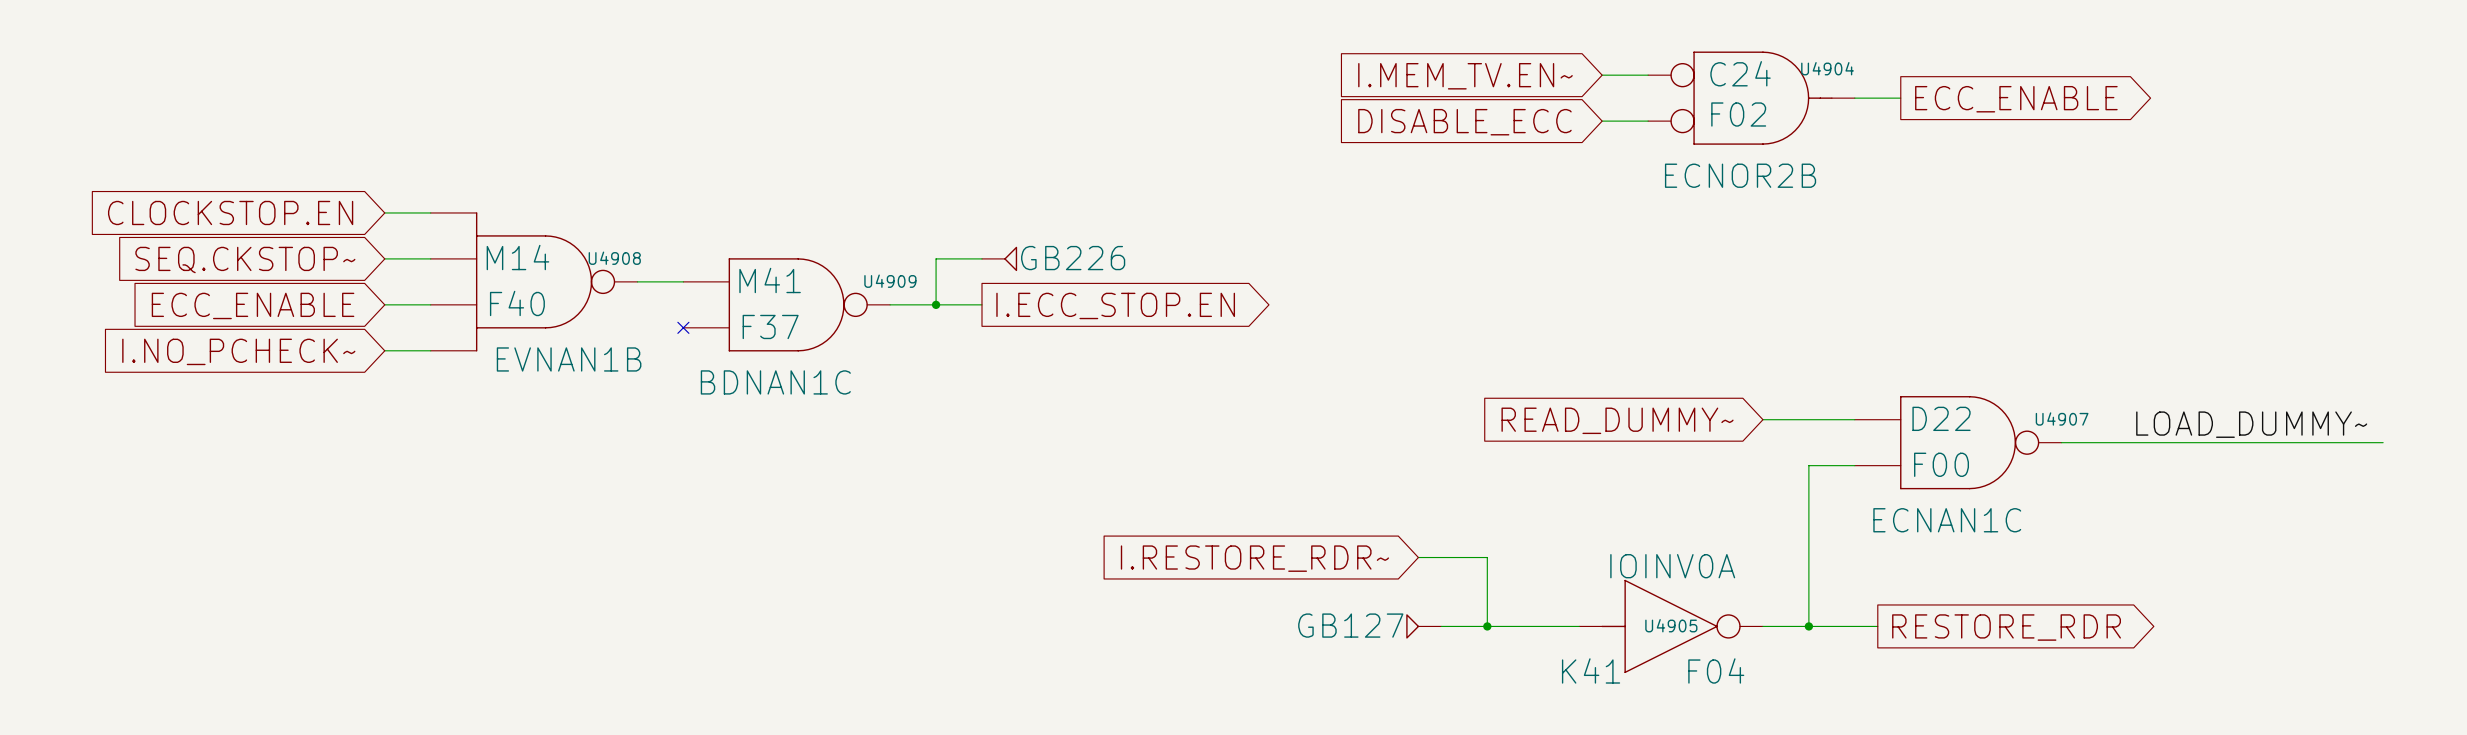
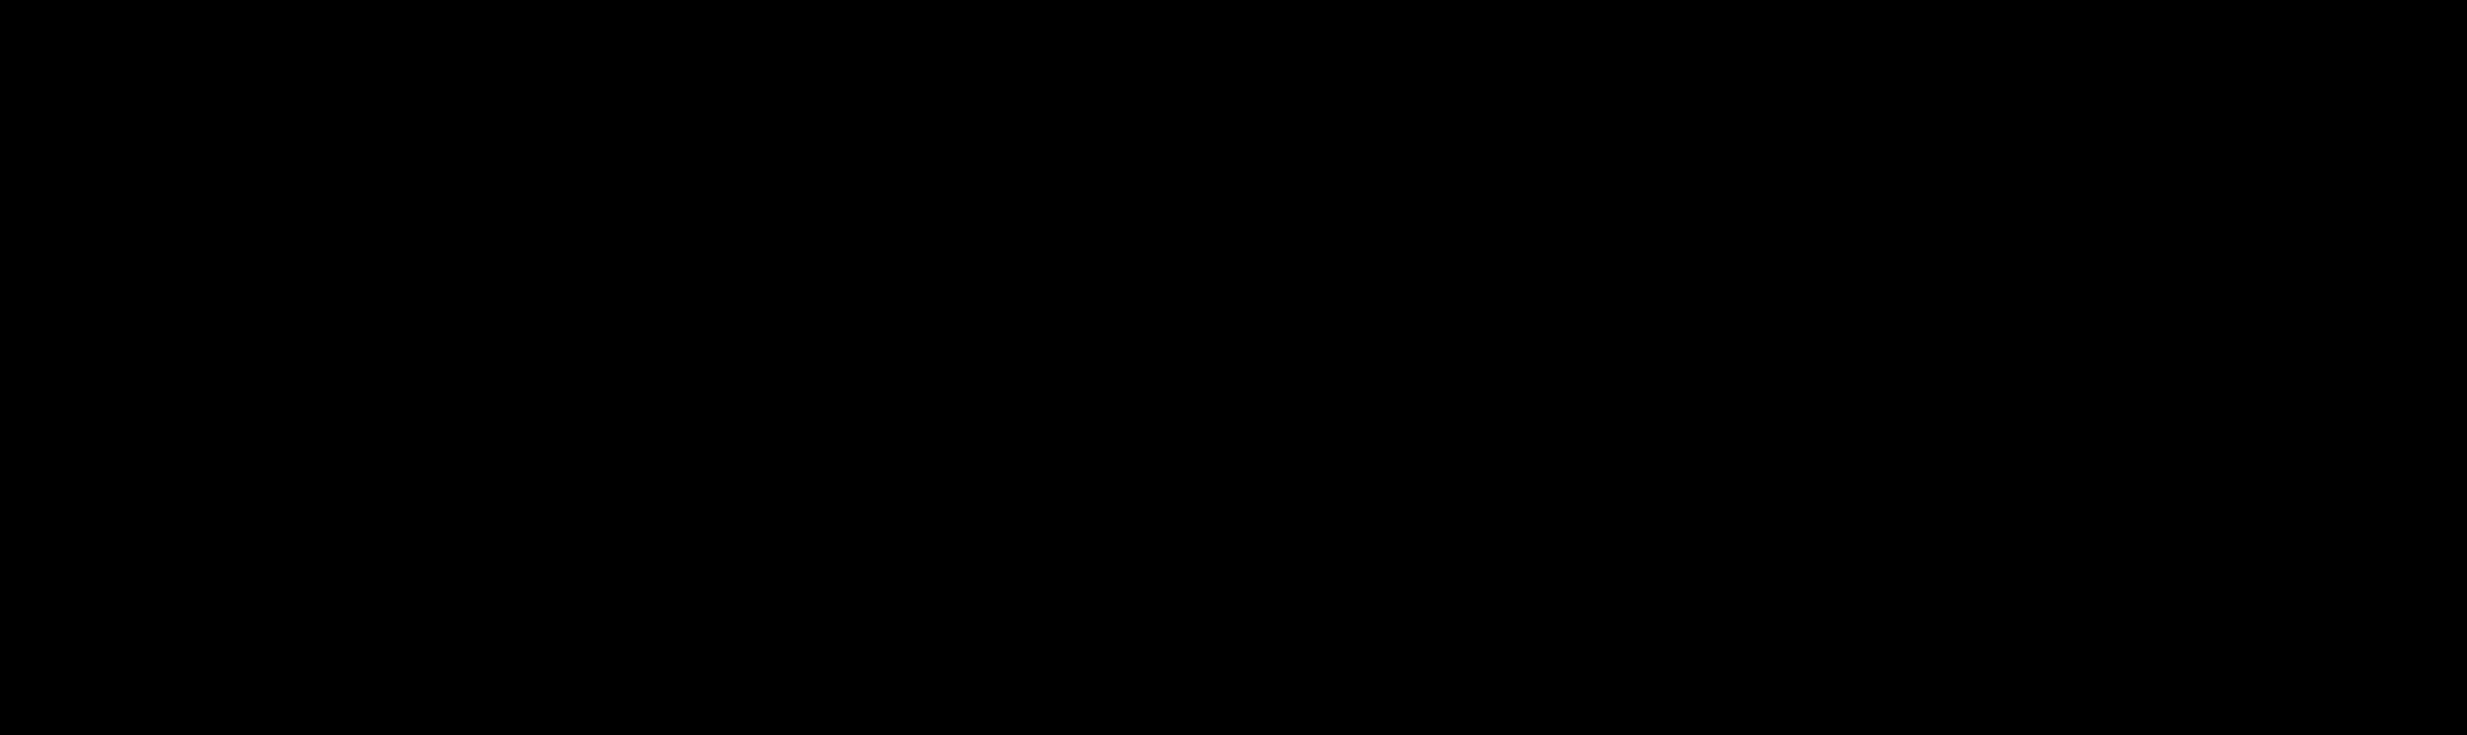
wire: (1602, 75) (1648, 75) -> none
global label: I.MEM_TV.EN~ (1465, 76) -> none
U4904: F02 (1751, 98) -> none
wire: (1854, 98) (1900, 98) -> none
global label: ECC_ENABLE (2016, 99) -> none
wire: (1602, 121) (1648, 121) -> none
global label: DISABLE_ECC (1464, 122) -> none
global label: CLOCKSTOP.EN (230, 212) -> none
wire: (384, 212) (430, 212) -> none
wire: (384, 258) (430, 258) -> none
wire: (981, 258) (936, 258) (936, 304) -> none
GB226: (999, 258) -> none
global label: SEQ.CKSTOP~ (245, 260) -> none
U4908: F40 (534, 281) -> none
wire: (637, 281) (683, 281) -> none
wire: (384, 304) (430, 304) -> none
U4909: F37 (786, 304) -> none
wire: (890, 304) (981, 304) -> none
junction: (936, 304) -> none
global label: ECC_ENABLE (253, 305) -> none
global label: I.ECC_STOP.EN (1115, 305) -> none
no-connect mark: (683, 327) -> none
wire: (384, 350) (430, 350) -> none
global label: I.NO_PCHECK~ (238, 351) -> none
wire: (1762, 419) (1854, 419) -> none
global label: READ_DUMMY~ (1617, 420) -> none
label: LOAD_DUMMY~ (2251, 424) -> none
U4907: F00 (1958, 442) -> none
wire: (2061, 442) (2383, 442) -> none
wire: (1854, 465) (1808, 465) (1808, 626) -> none
wire: (1418, 557) (1487, 557) (1487, 626) -> none
global label: I.RESTORE_RDR~ (1254, 558) -> none
GB127: (1423, 626) -> none
wire: (1441, 626) (1579, 626) -> none
junction: (1487, 626) -> none
U4905: F04 (1671, 626) -> none
wire: (1762, 626) (1877, 626) -> none
junction: (1808, 626) -> none
global label: RESTORE_RDR (2006, 627) -> none

